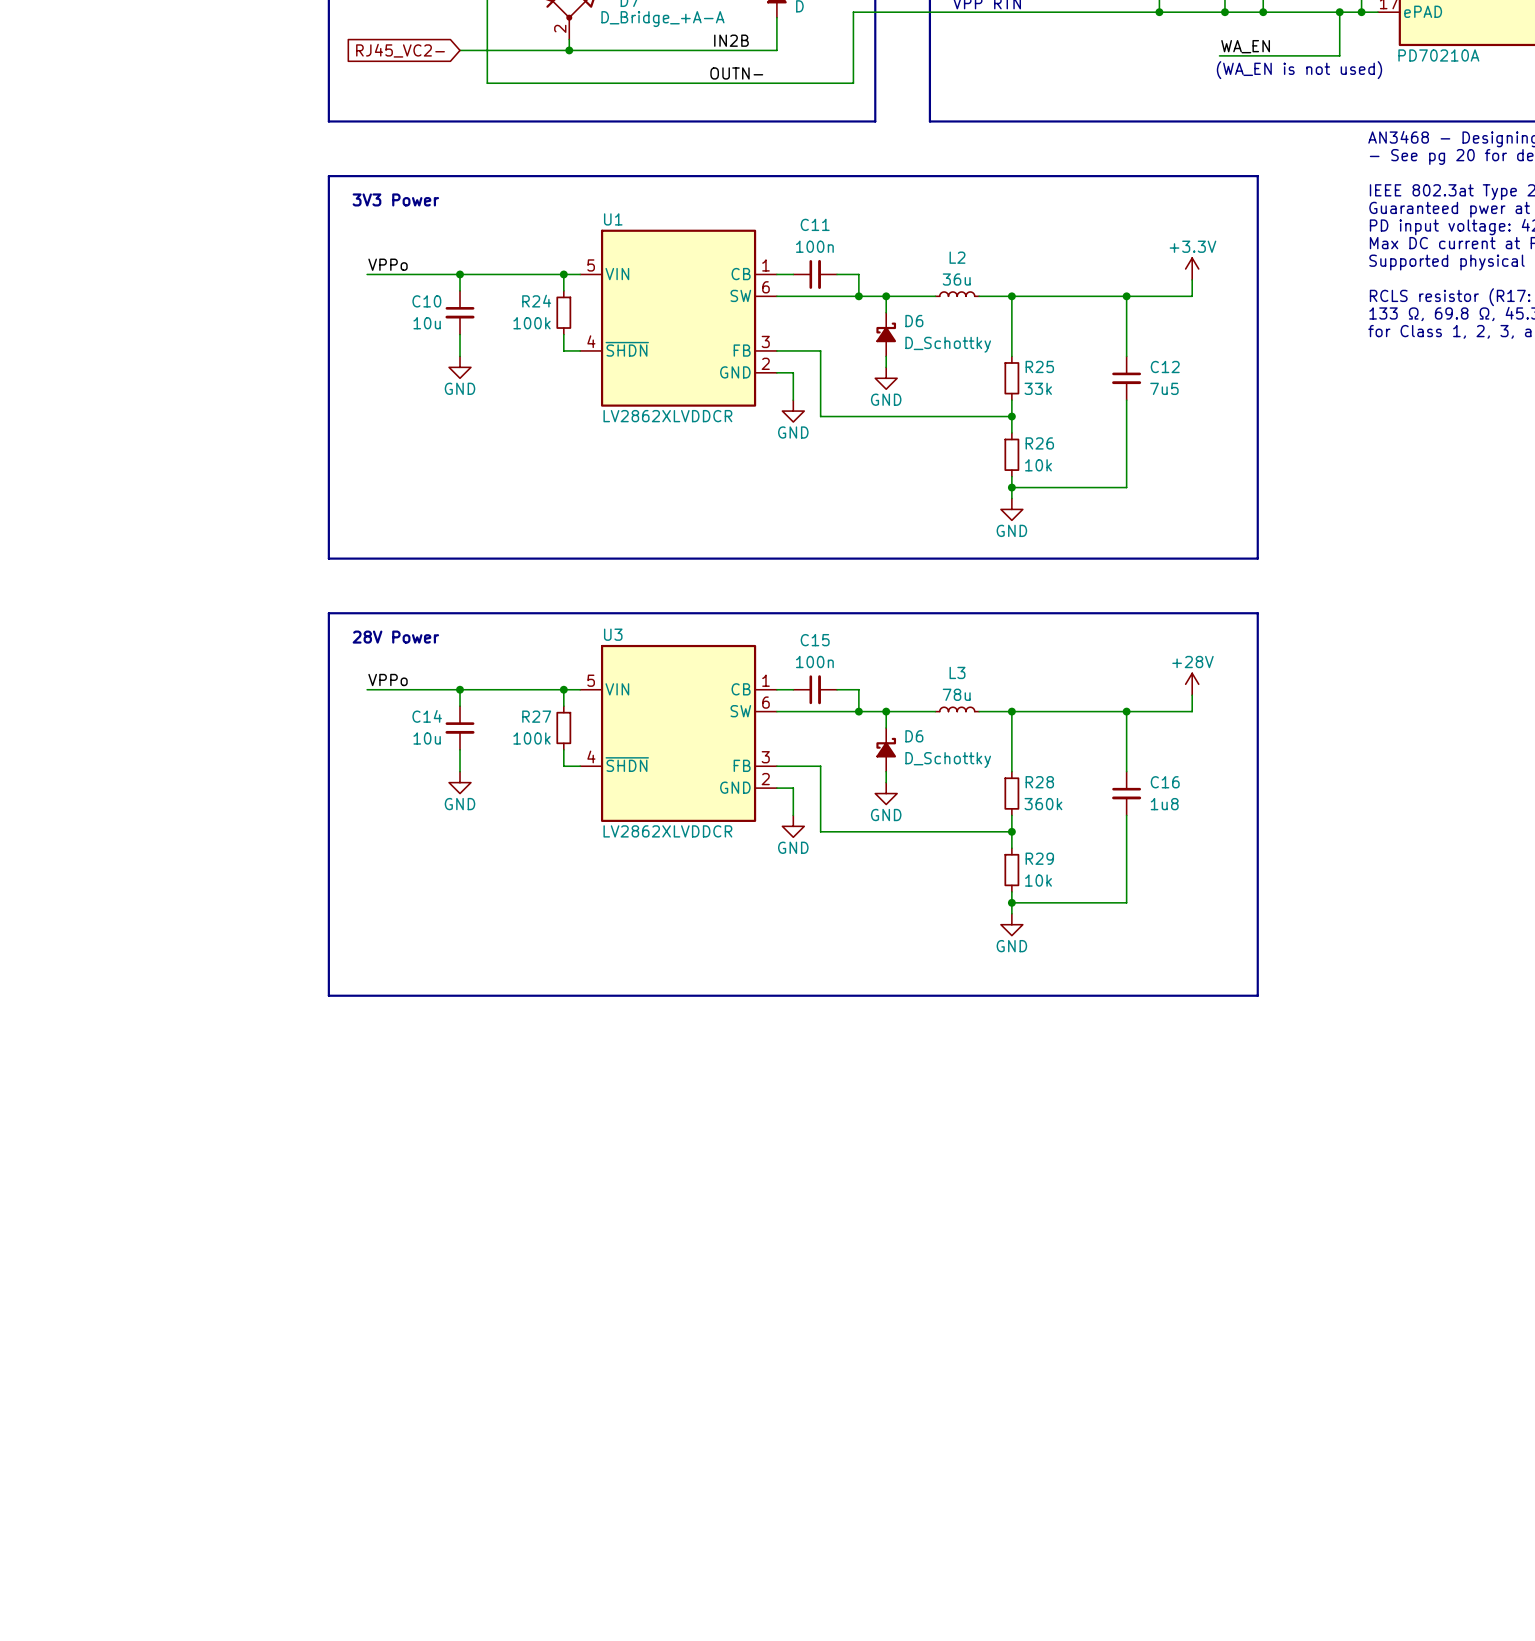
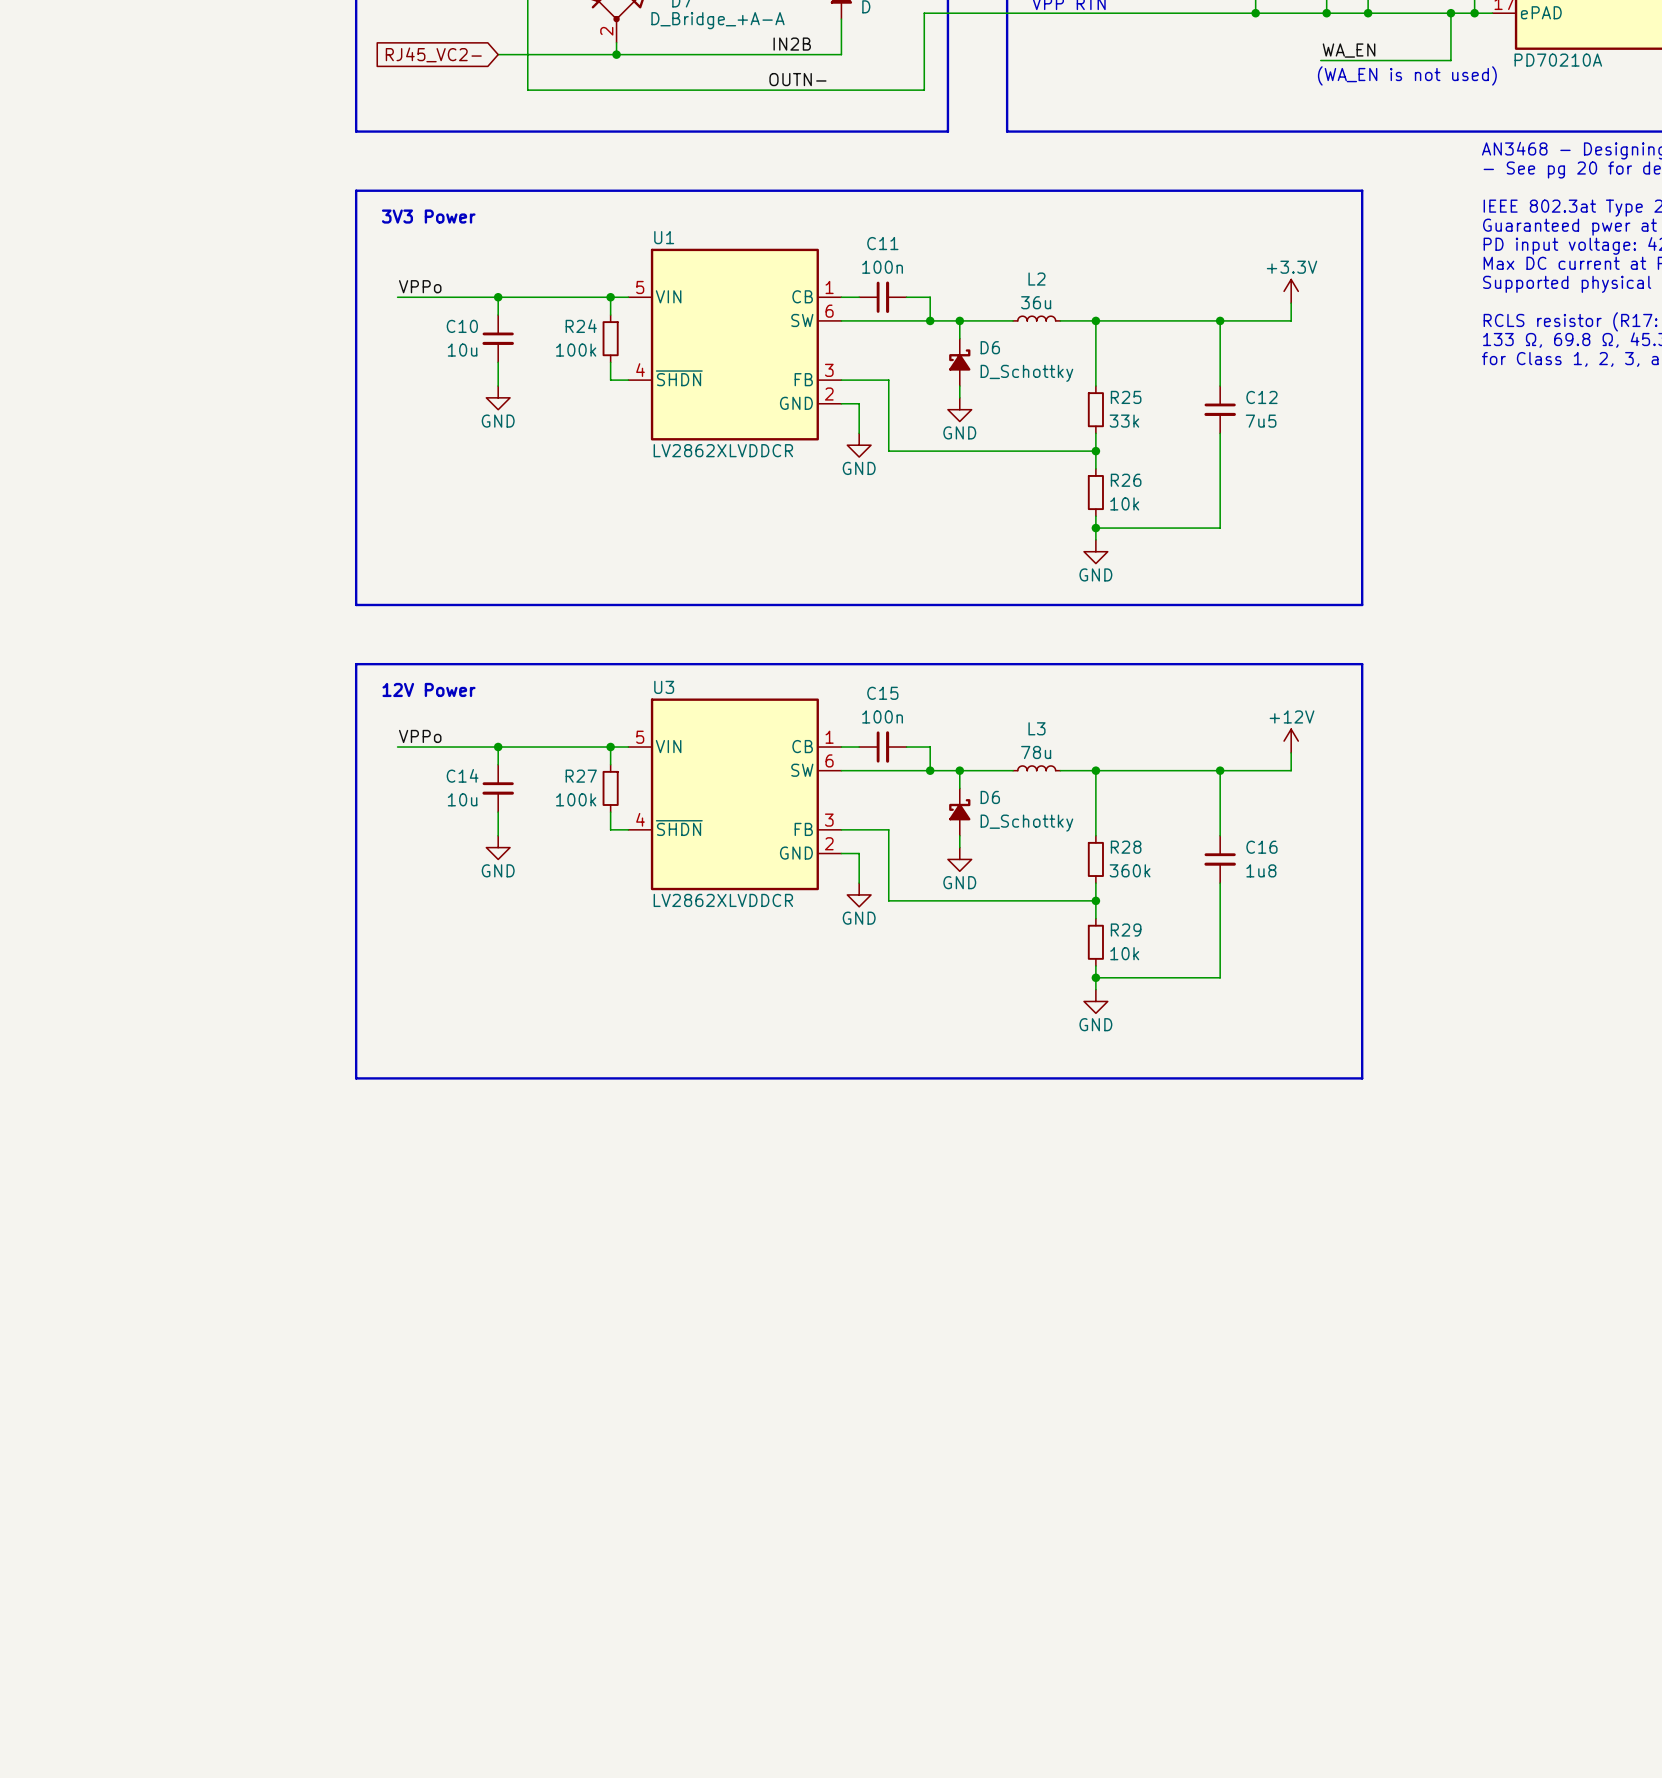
text: 28V Power (395, 637) -> 12V Power (429, 689)
power symbol: +28V (1192, 684) -> +12V (1291, 741)

